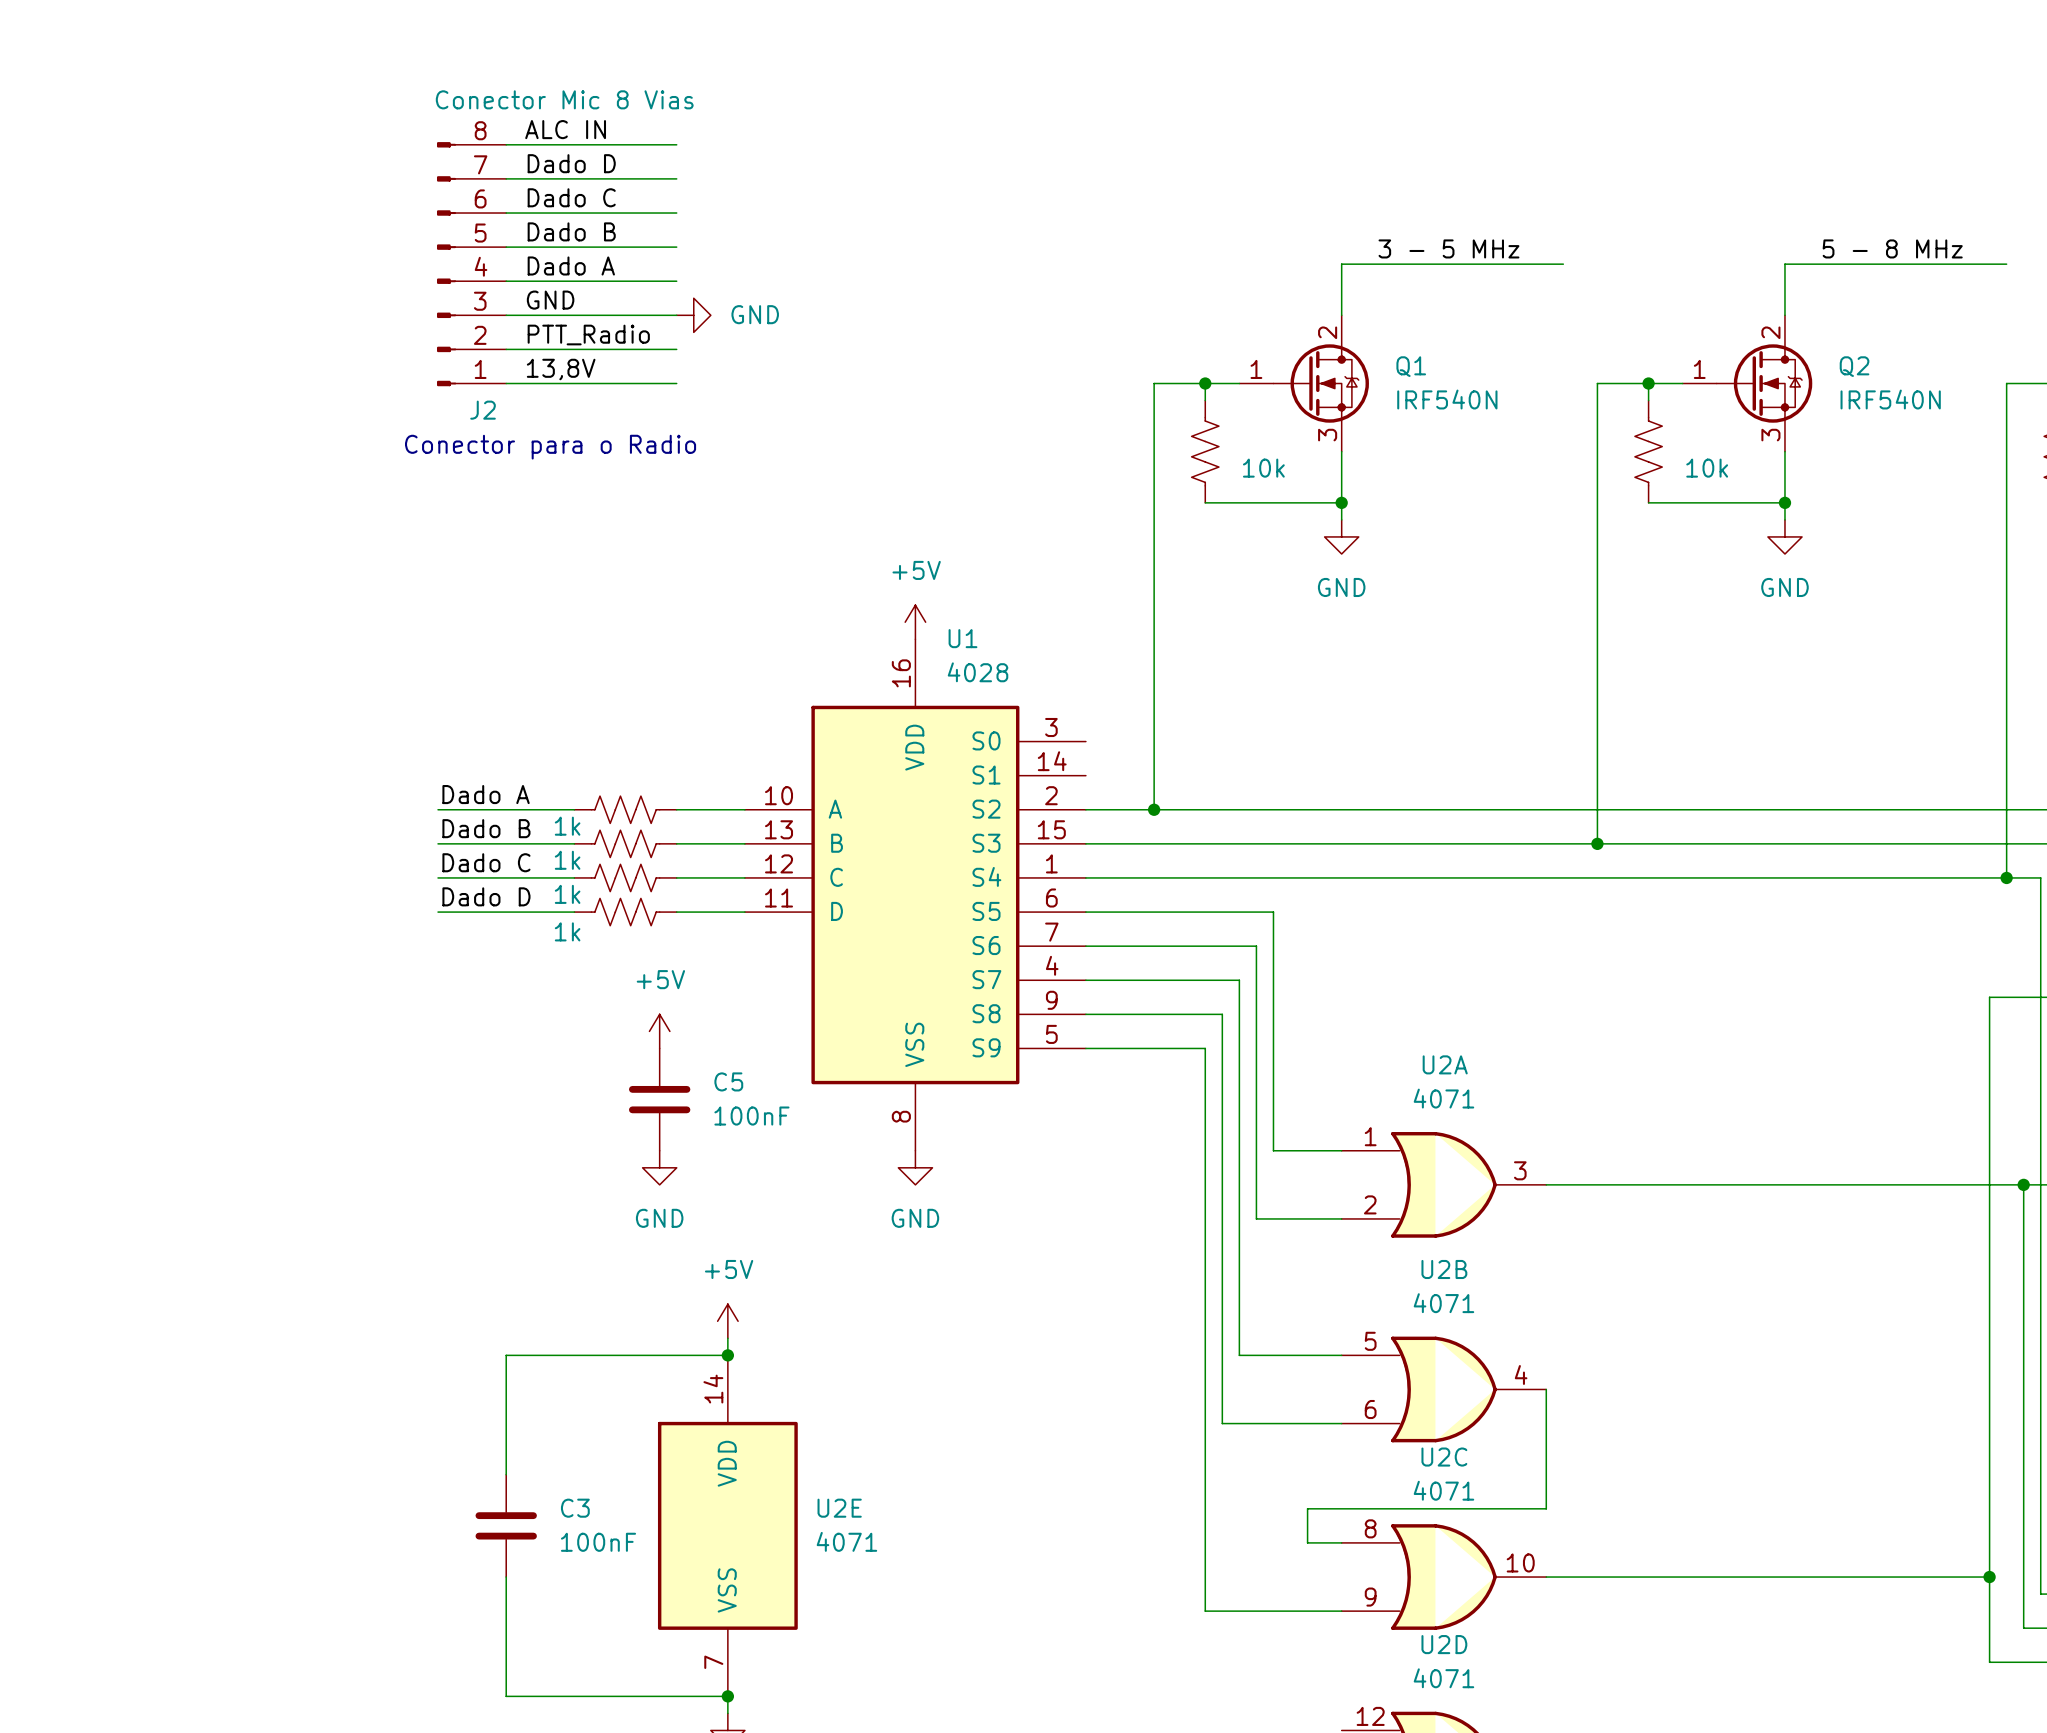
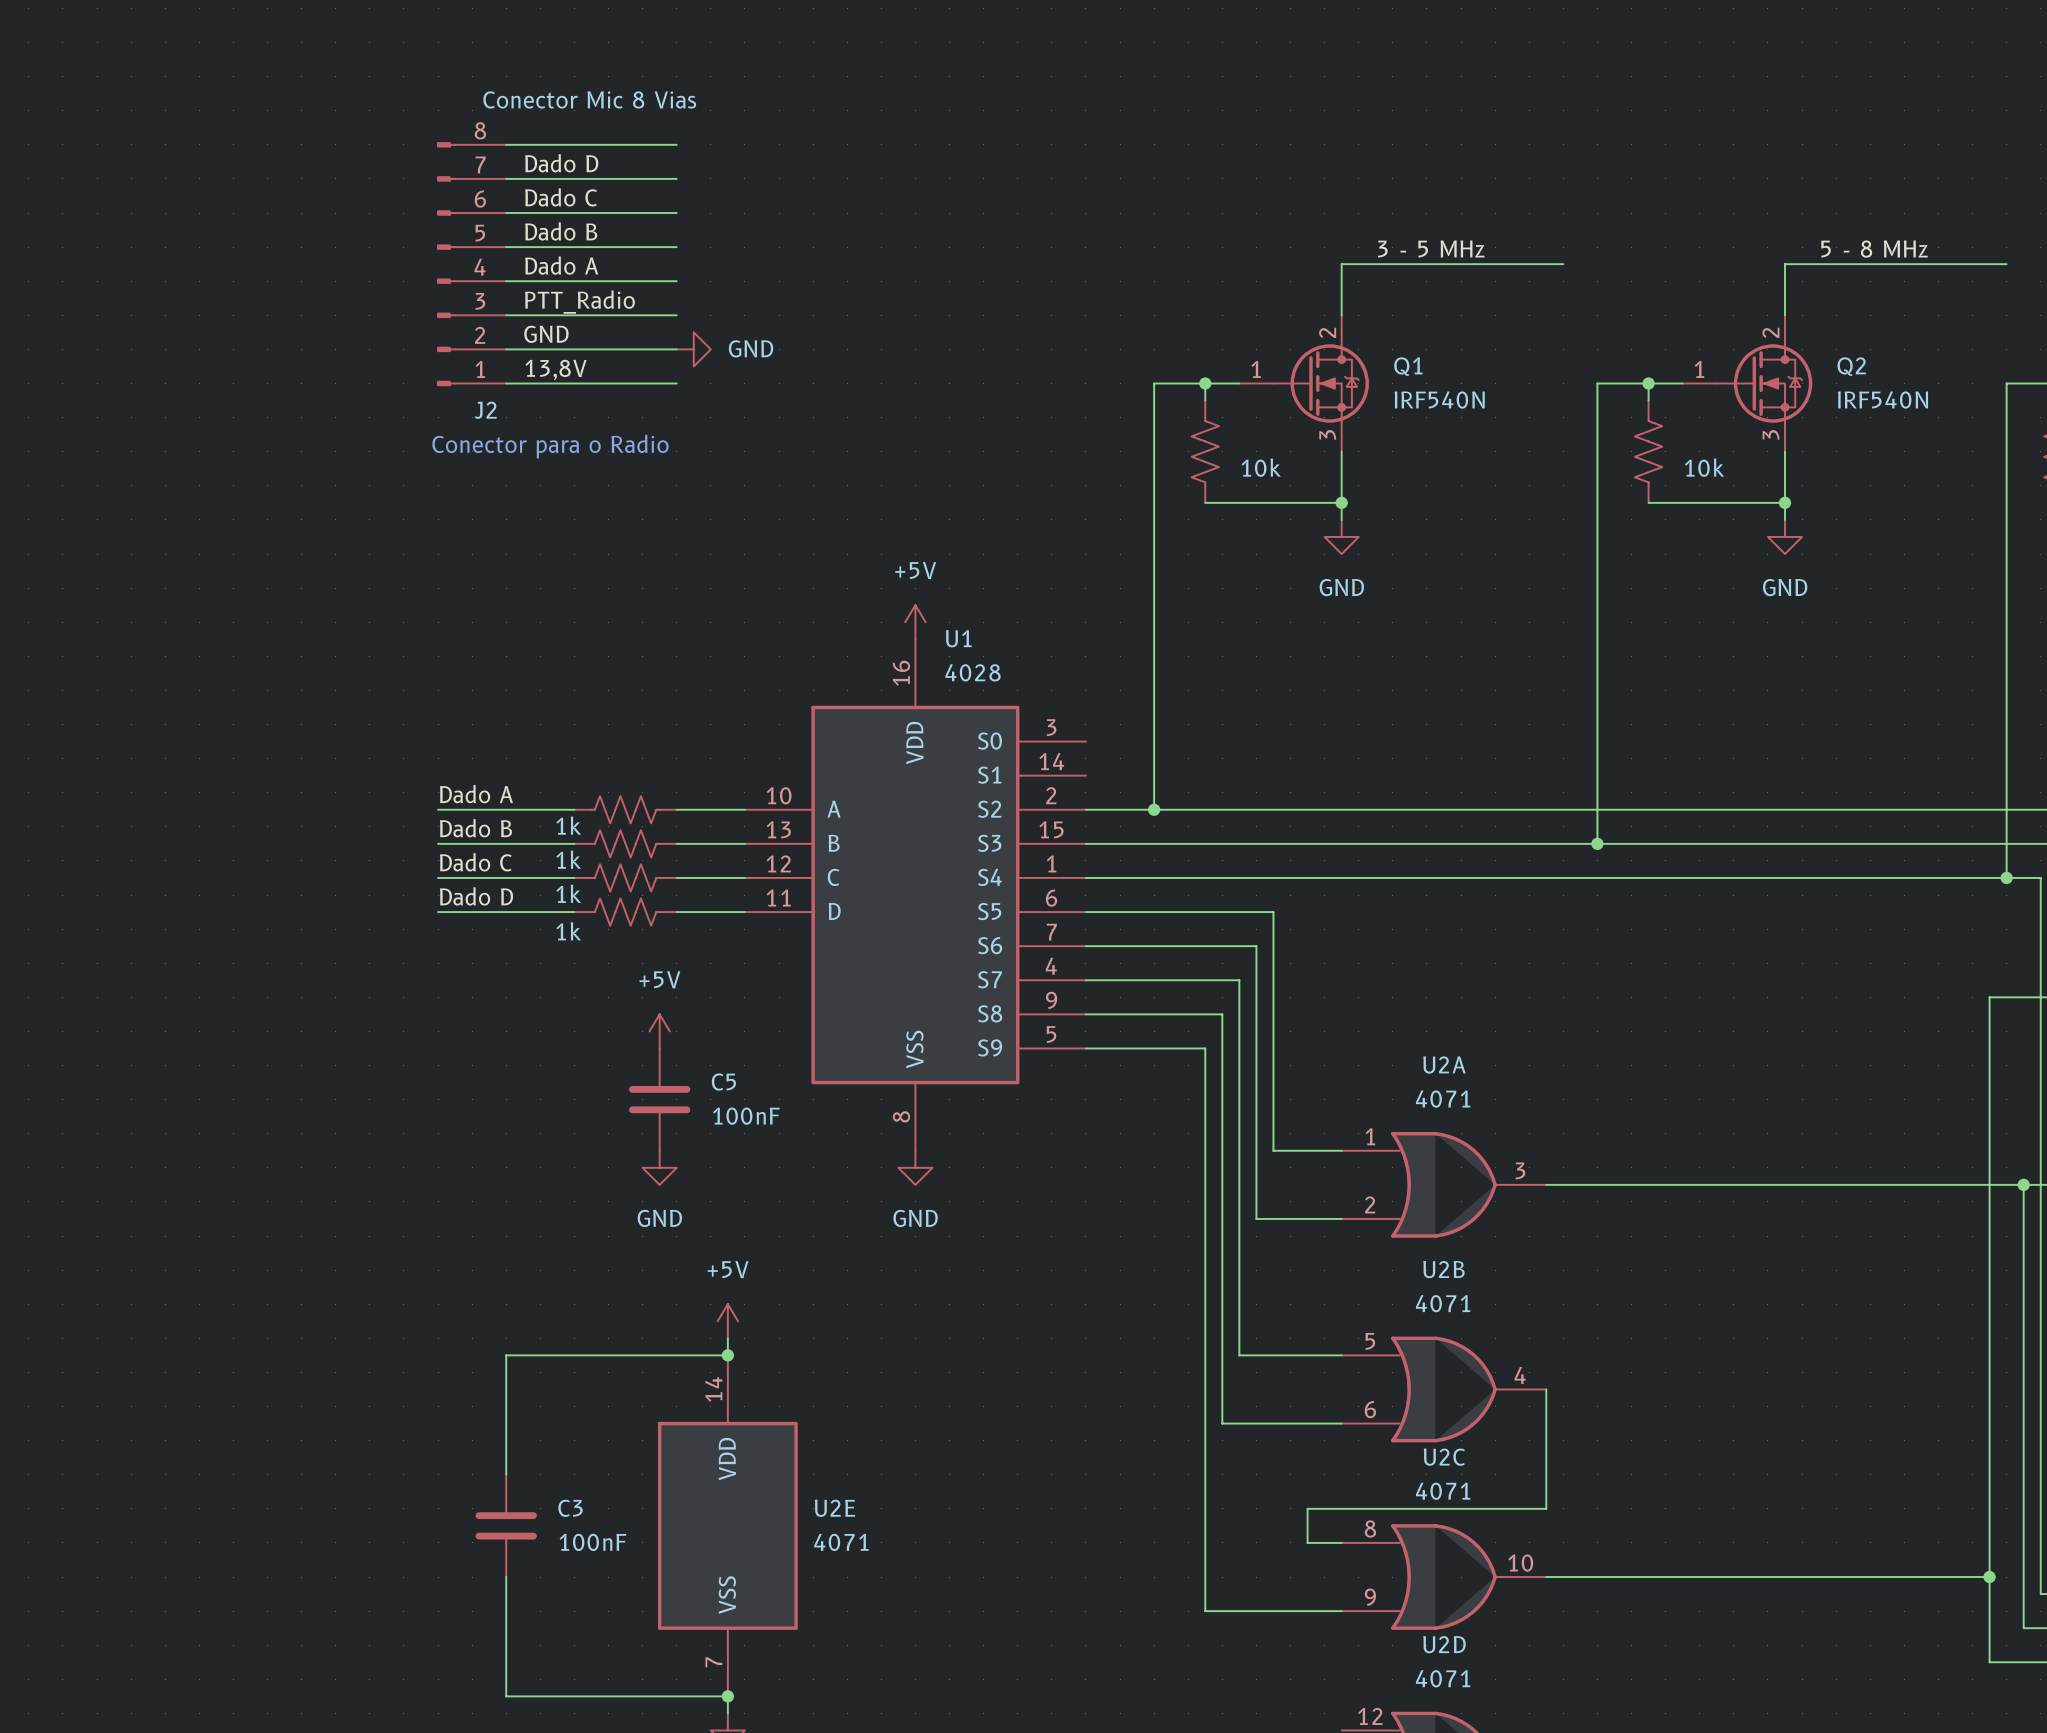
label: ALC IN (565, 129) -> none
label: GND (550, 300) -> PTT_Radio (579, 302)
power symbol position: GND (693, 315) -> GND (693, 349)
label: PTT_Radio (588, 335) -> GND (546, 334)

